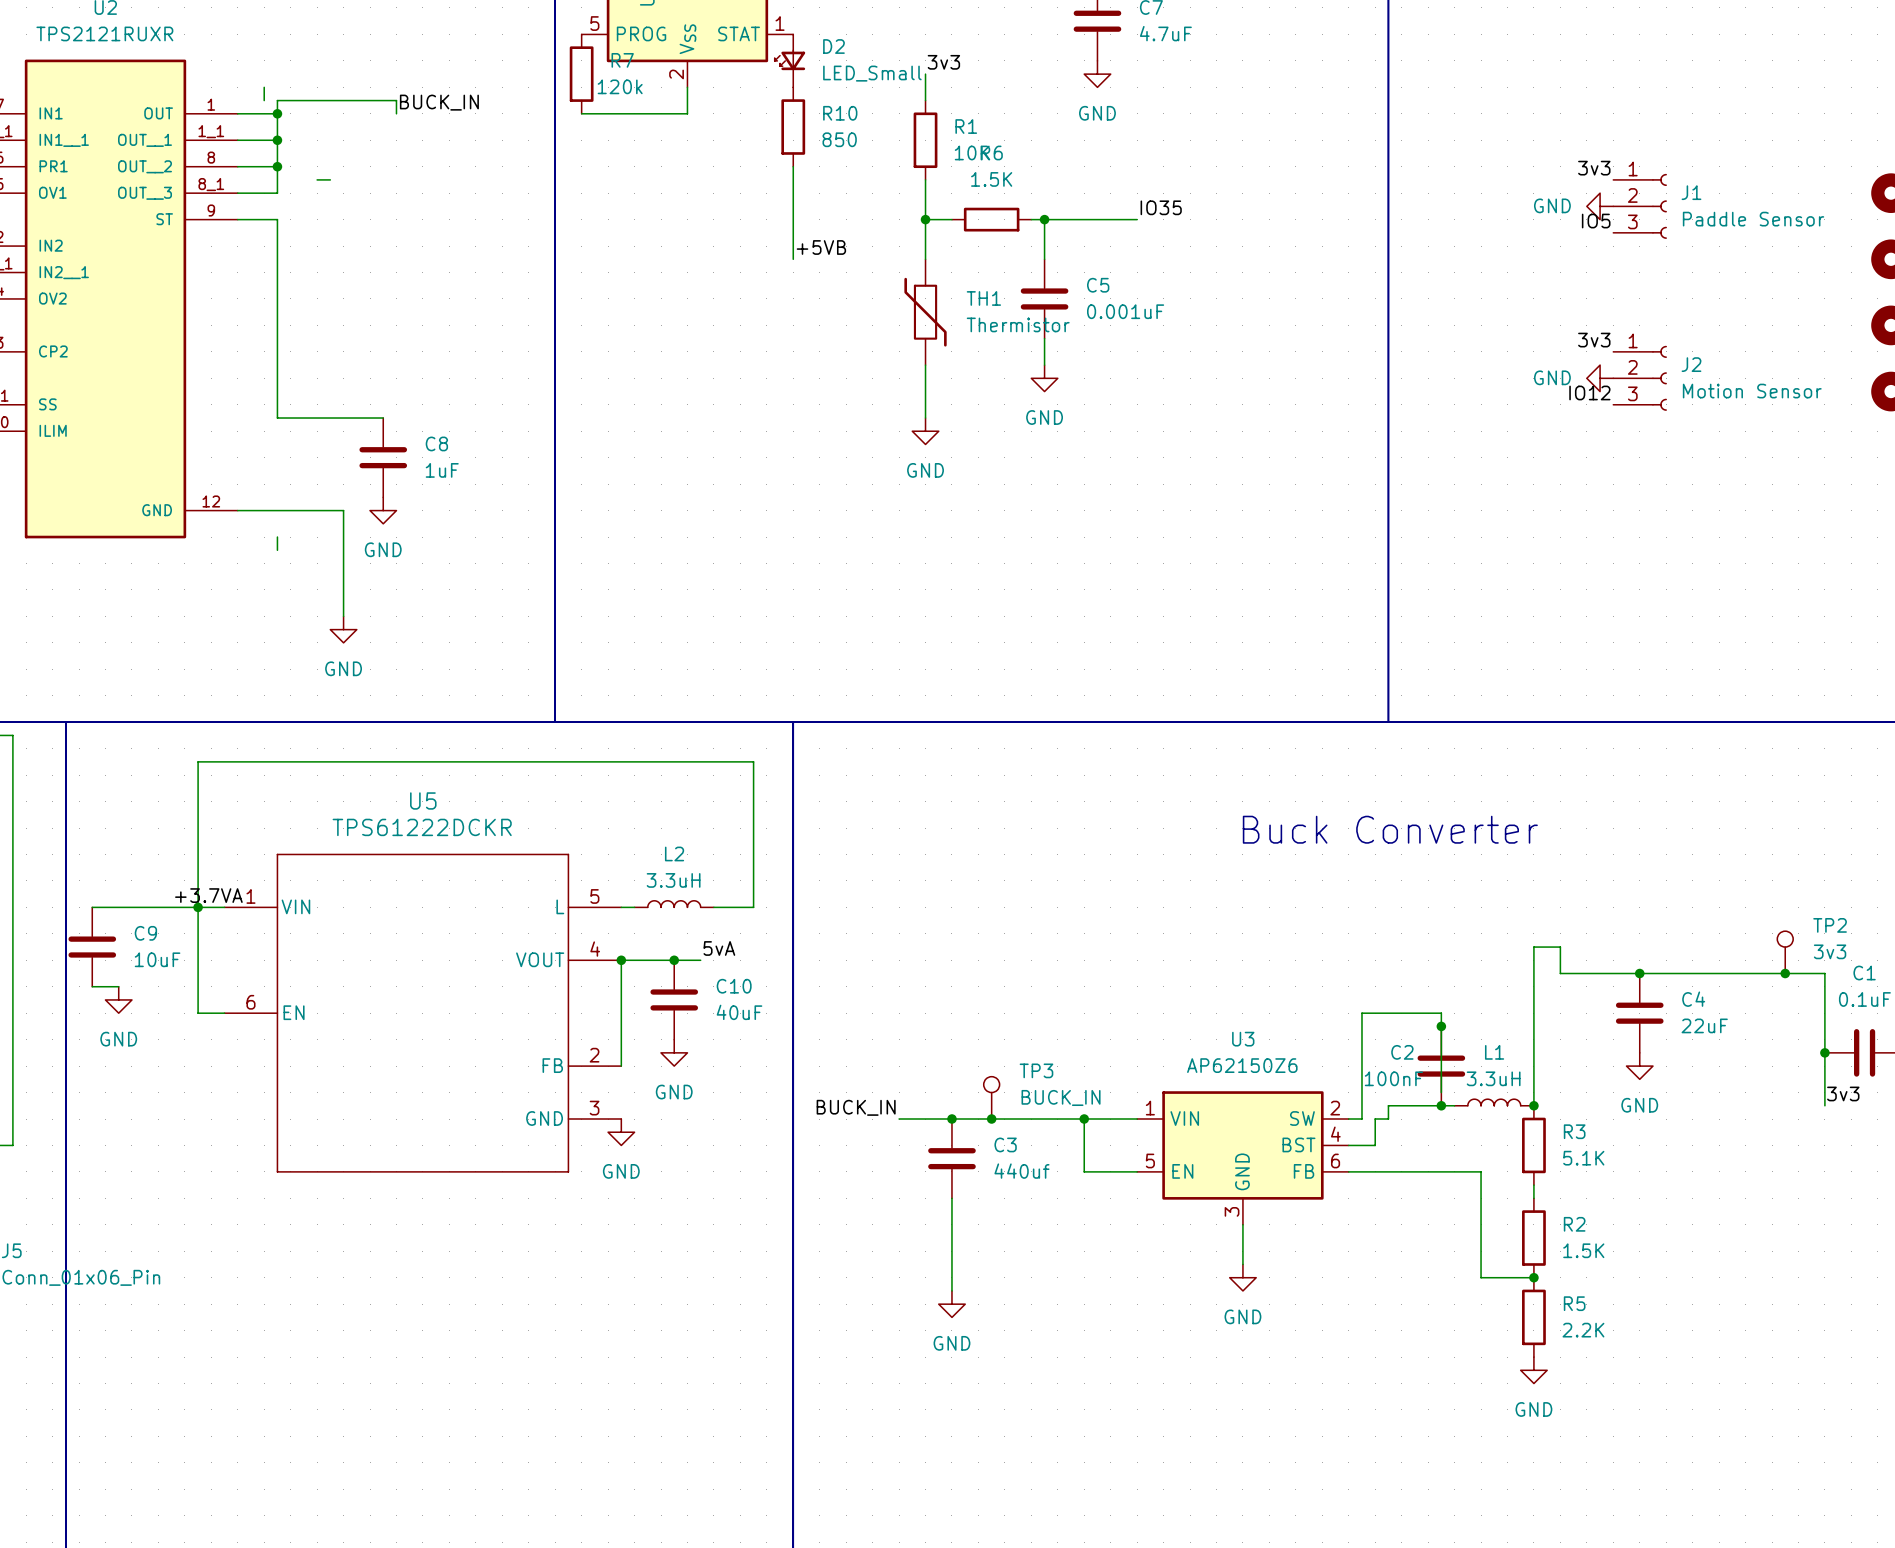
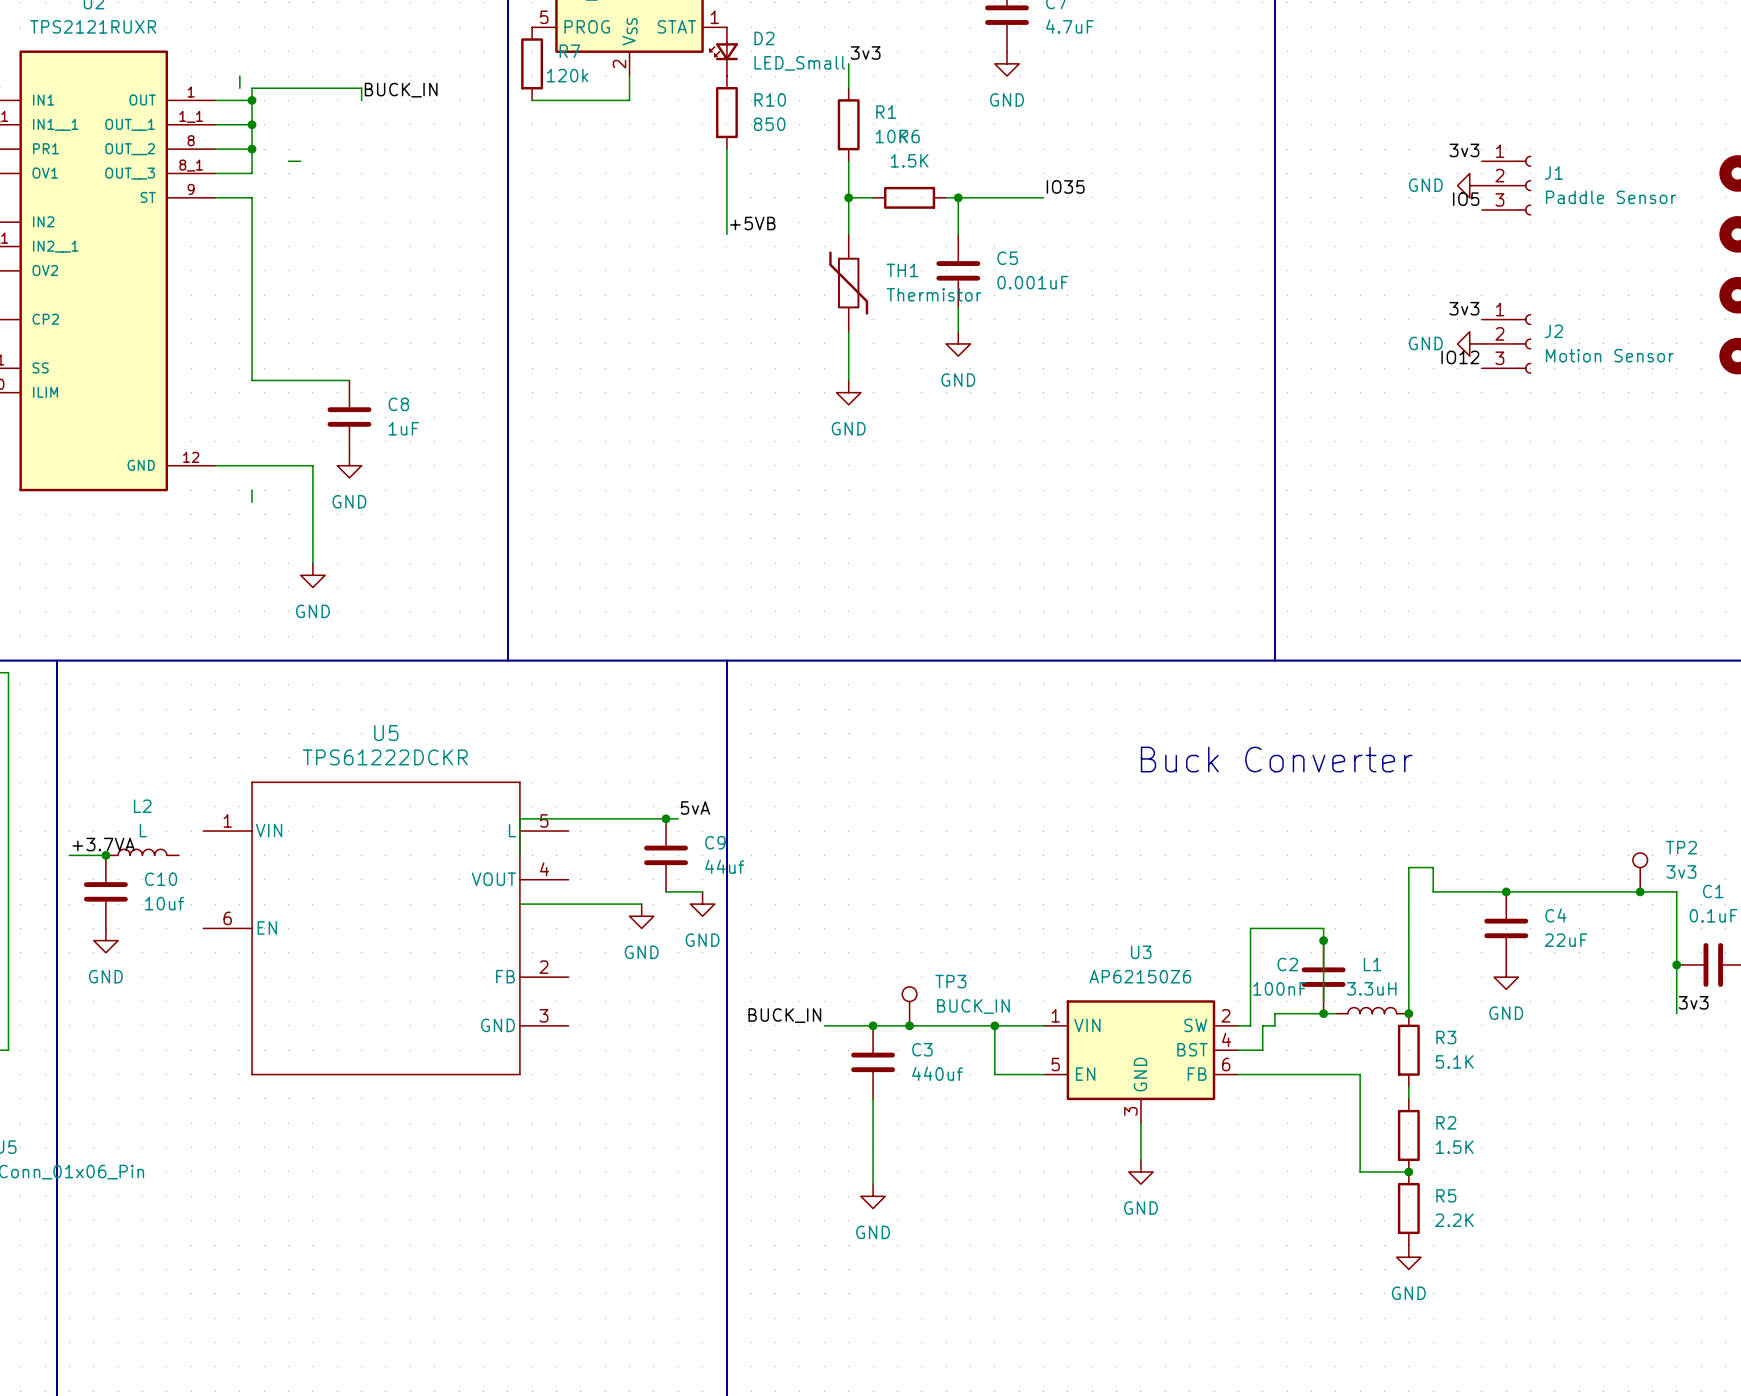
L2 value: 3.3uH (673, 880) -> L (143, 830)
junction: none -> (666, 818)
wire: none -> (678, 818) (519, 818) (519, 855)
label position: +3.7VA (208, 895) -> +3.7VA (103, 844)
L2 position: (674, 904) -> (142, 852)
wire: (92, 907) (224, 907) -> none
junction: (198, 907) -> none
wire: (621, 907) (634, 907) -> none
wire: (713, 907) (753, 907) (753, 761) (198, 761) (198, 1013) (224, 1013) -> none
wire: none -> (69, 855) (105, 855)
junction: none -> (105, 855)
C9 position: (92, 947) -> (666, 855)
label position: 5vA (719, 948) -> 5vA (695, 807)
C9 value: 10uF (157, 959) -> 44uf (724, 866)
junction: (621, 960) -> none
junction: (674, 960) -> none
wire: (700, 960) (621, 960) (621, 1066) -> none
wire: none -> (666, 891) (702, 891)
wire: (92, 986) (118, 986) -> none
wire: none -> (519, 904) (641, 904)
power symbol: none -> GND (702, 904)
power symbol position: GND (118, 999) -> GND (105, 940)
C10 position: (674, 999) -> (105, 891)
power symbol: none -> GND (641, 916)
C10 value: 40uF (739, 1012) -> 10uf (164, 903)
power symbol: GND (674, 1052) -> none
power symbol: GND (621, 1132) -> none

